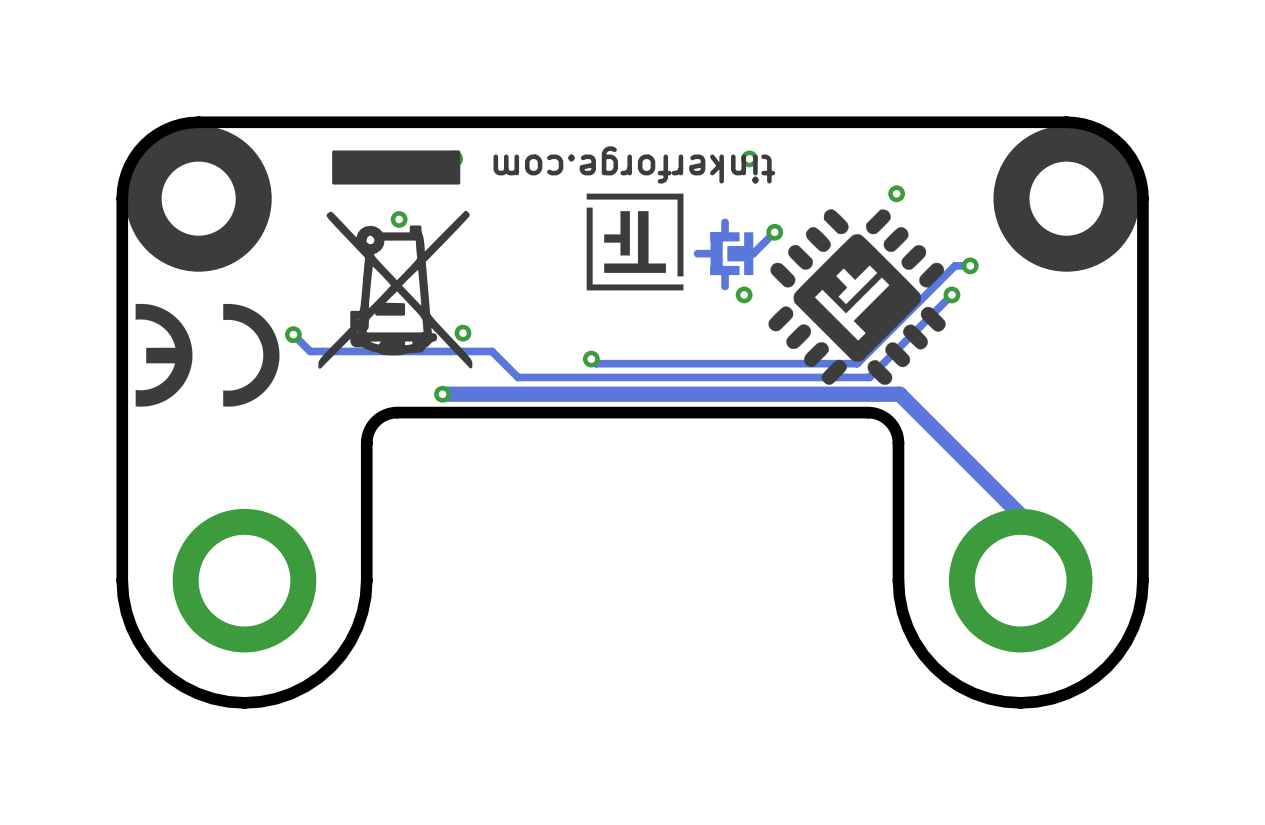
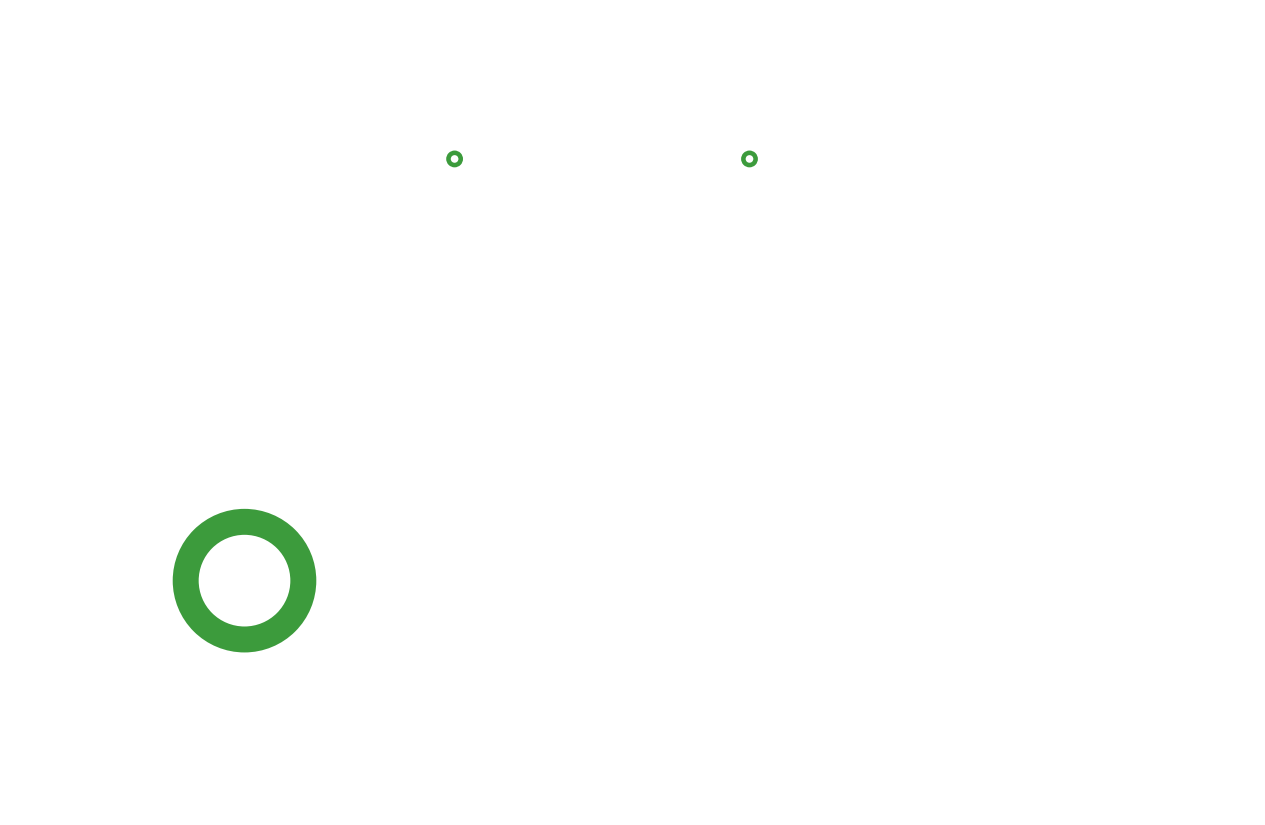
board edge: (1066, 122) (198, 122) (181, 124) (158, 133) (138, 151) (129, 165) (124, 181) (122, 198) (122, 580) (126, 612) (138, 641) (158, 667) (170, 677) (197, 693) (228, 701) (244, 702) (276, 698) (305, 686) (330, 667) (350, 641) (362, 612) (366, 580) (366, 439) (373, 424) (387, 414) (397, 412) (867, 412) (877, 414) (886, 419) (893, 426) (897, 436) (899, 596) (907, 627) (923, 655) (934, 667) (959, 686) (989, 698) (1004, 701) (1036, 701) (1067, 693) (1081, 686) (1107, 667) (1126, 641) (1133, 627) (1141, 596) (1142, 198) (1141, 181) (1135, 165) (1120, 144) (1107, 133) (1091, 126) (1066, 122) -> none
drawing: [318, 150, 473, 369] -> none
text: tinkerforge.com (634, 164) -> none
drawing: [586, 193, 684, 291] -> none
via: (896, 193) -> none
part: (198, 198) -> none
part: (1066, 198) -> none
drawing: [768, 209, 946, 385] -> none
via: (399, 219) -> none
track: (725, 222) (725, 236) -> none
track: (774, 232) (753, 253) (736, 253) -> none
via: (774, 232) -> none
track: (716, 253) (697, 253) -> none
part: (731, 253) -> none
track: (970, 265) (954, 265) (857, 363) (595, 363) (591, 359) -> none
via: (970, 265) -> none
track: (725, 270) (725, 286) -> none
via: (744, 294) -> none
track: (951, 294) (869, 377) (518, 377) (492, 351) (310, 351) (293, 334) -> none
via: (951, 294) -> none
drawing: [135, 303, 280, 407] -> none
via: (463, 333) -> none
via: (293, 334) -> none
via: (591, 359) -> none
track: (442, 394) (899, 394) (1020, 515) (1020, 580) -> none
via: (442, 394) -> none
part: (1020, 580) -> none

